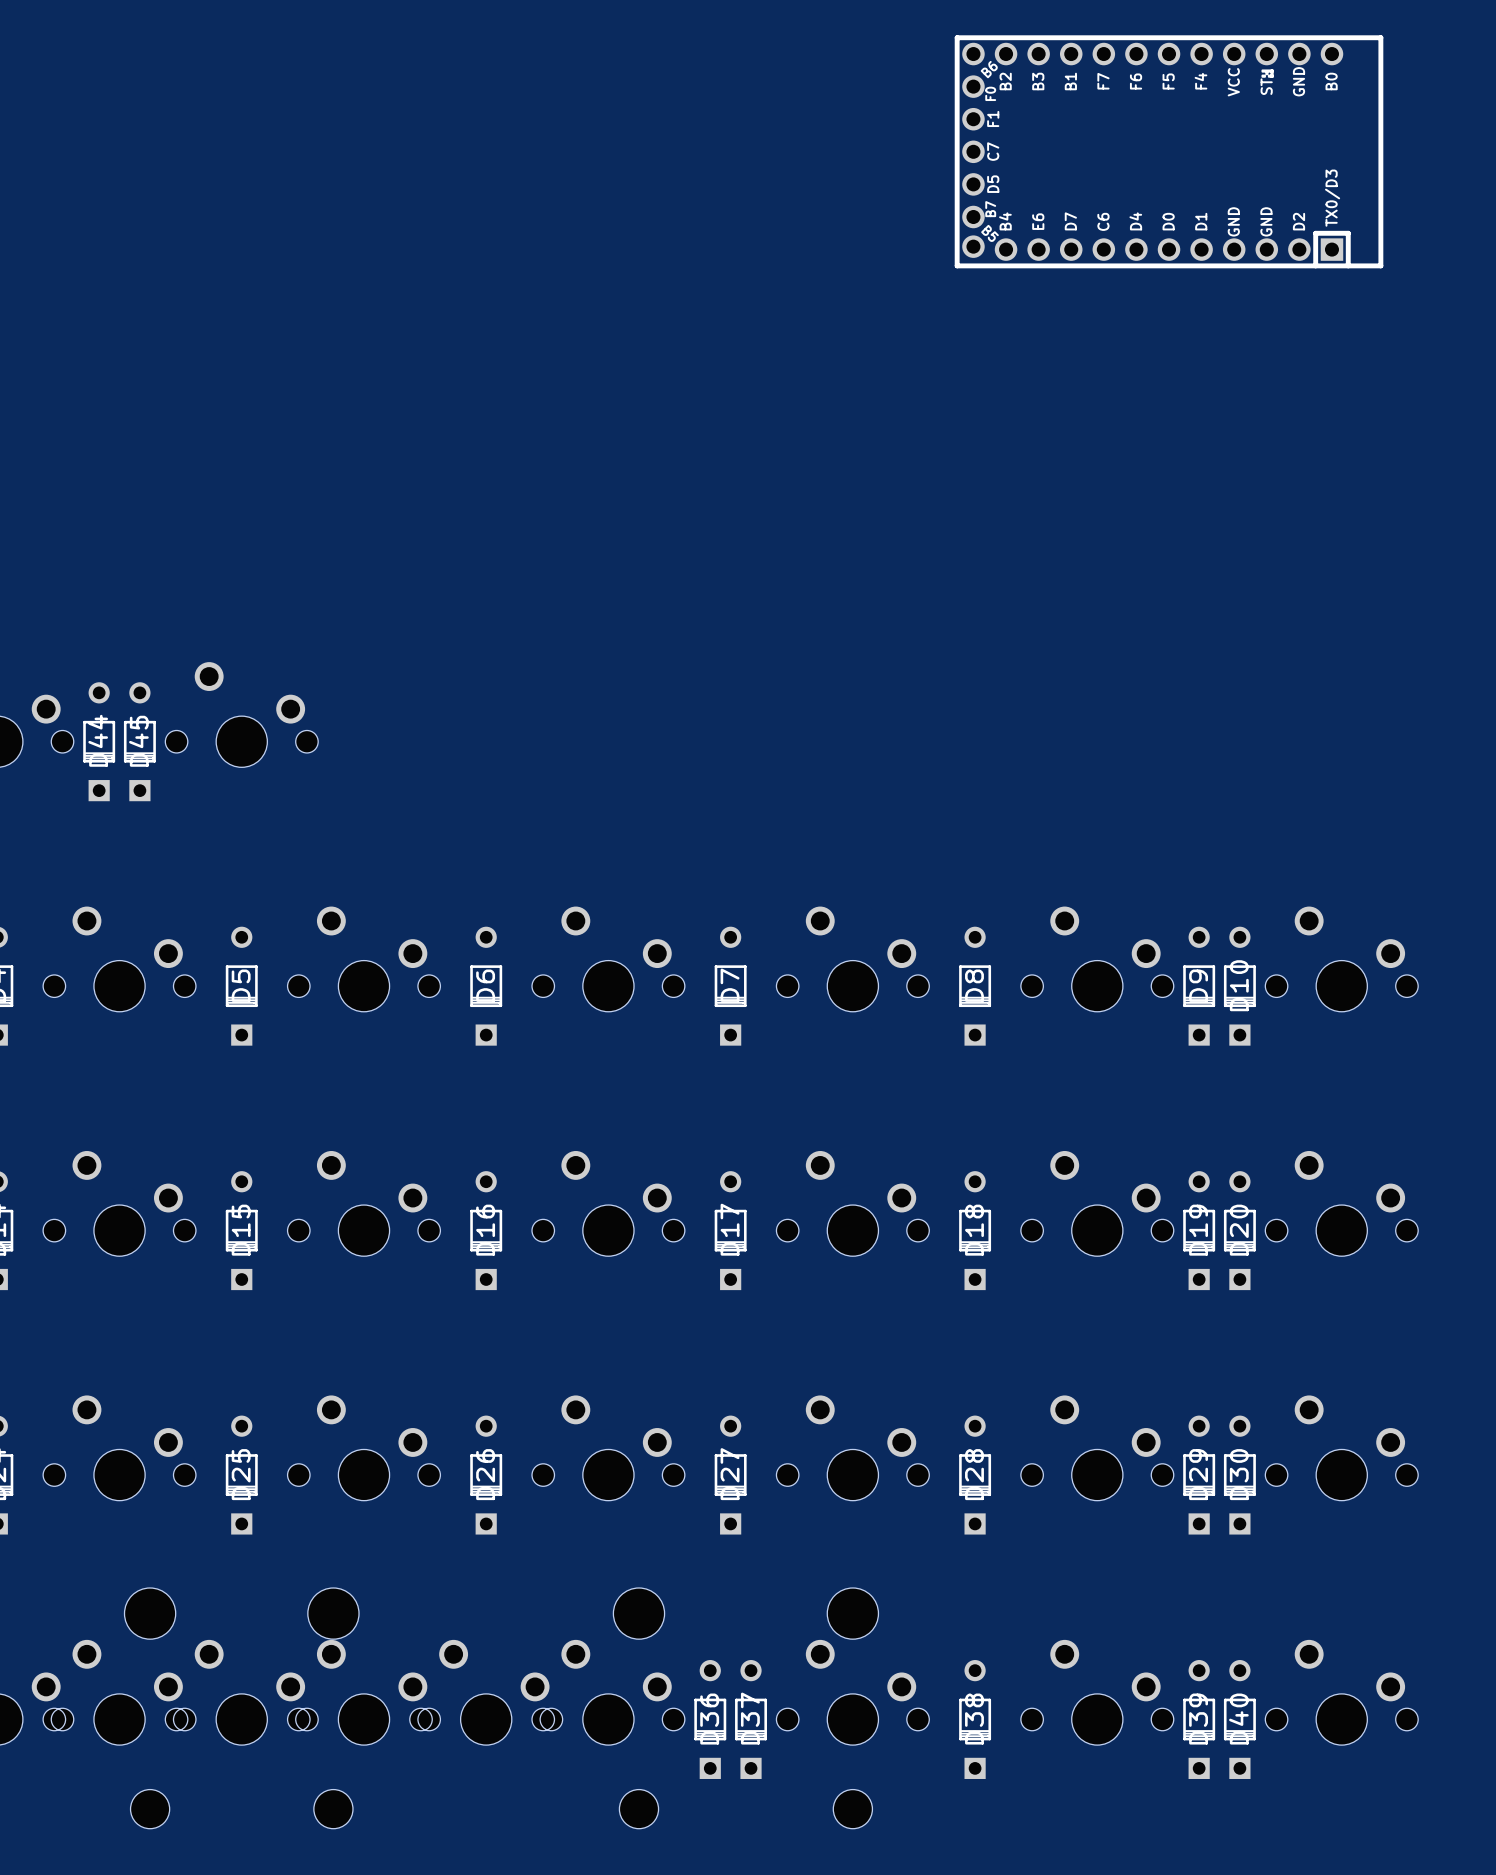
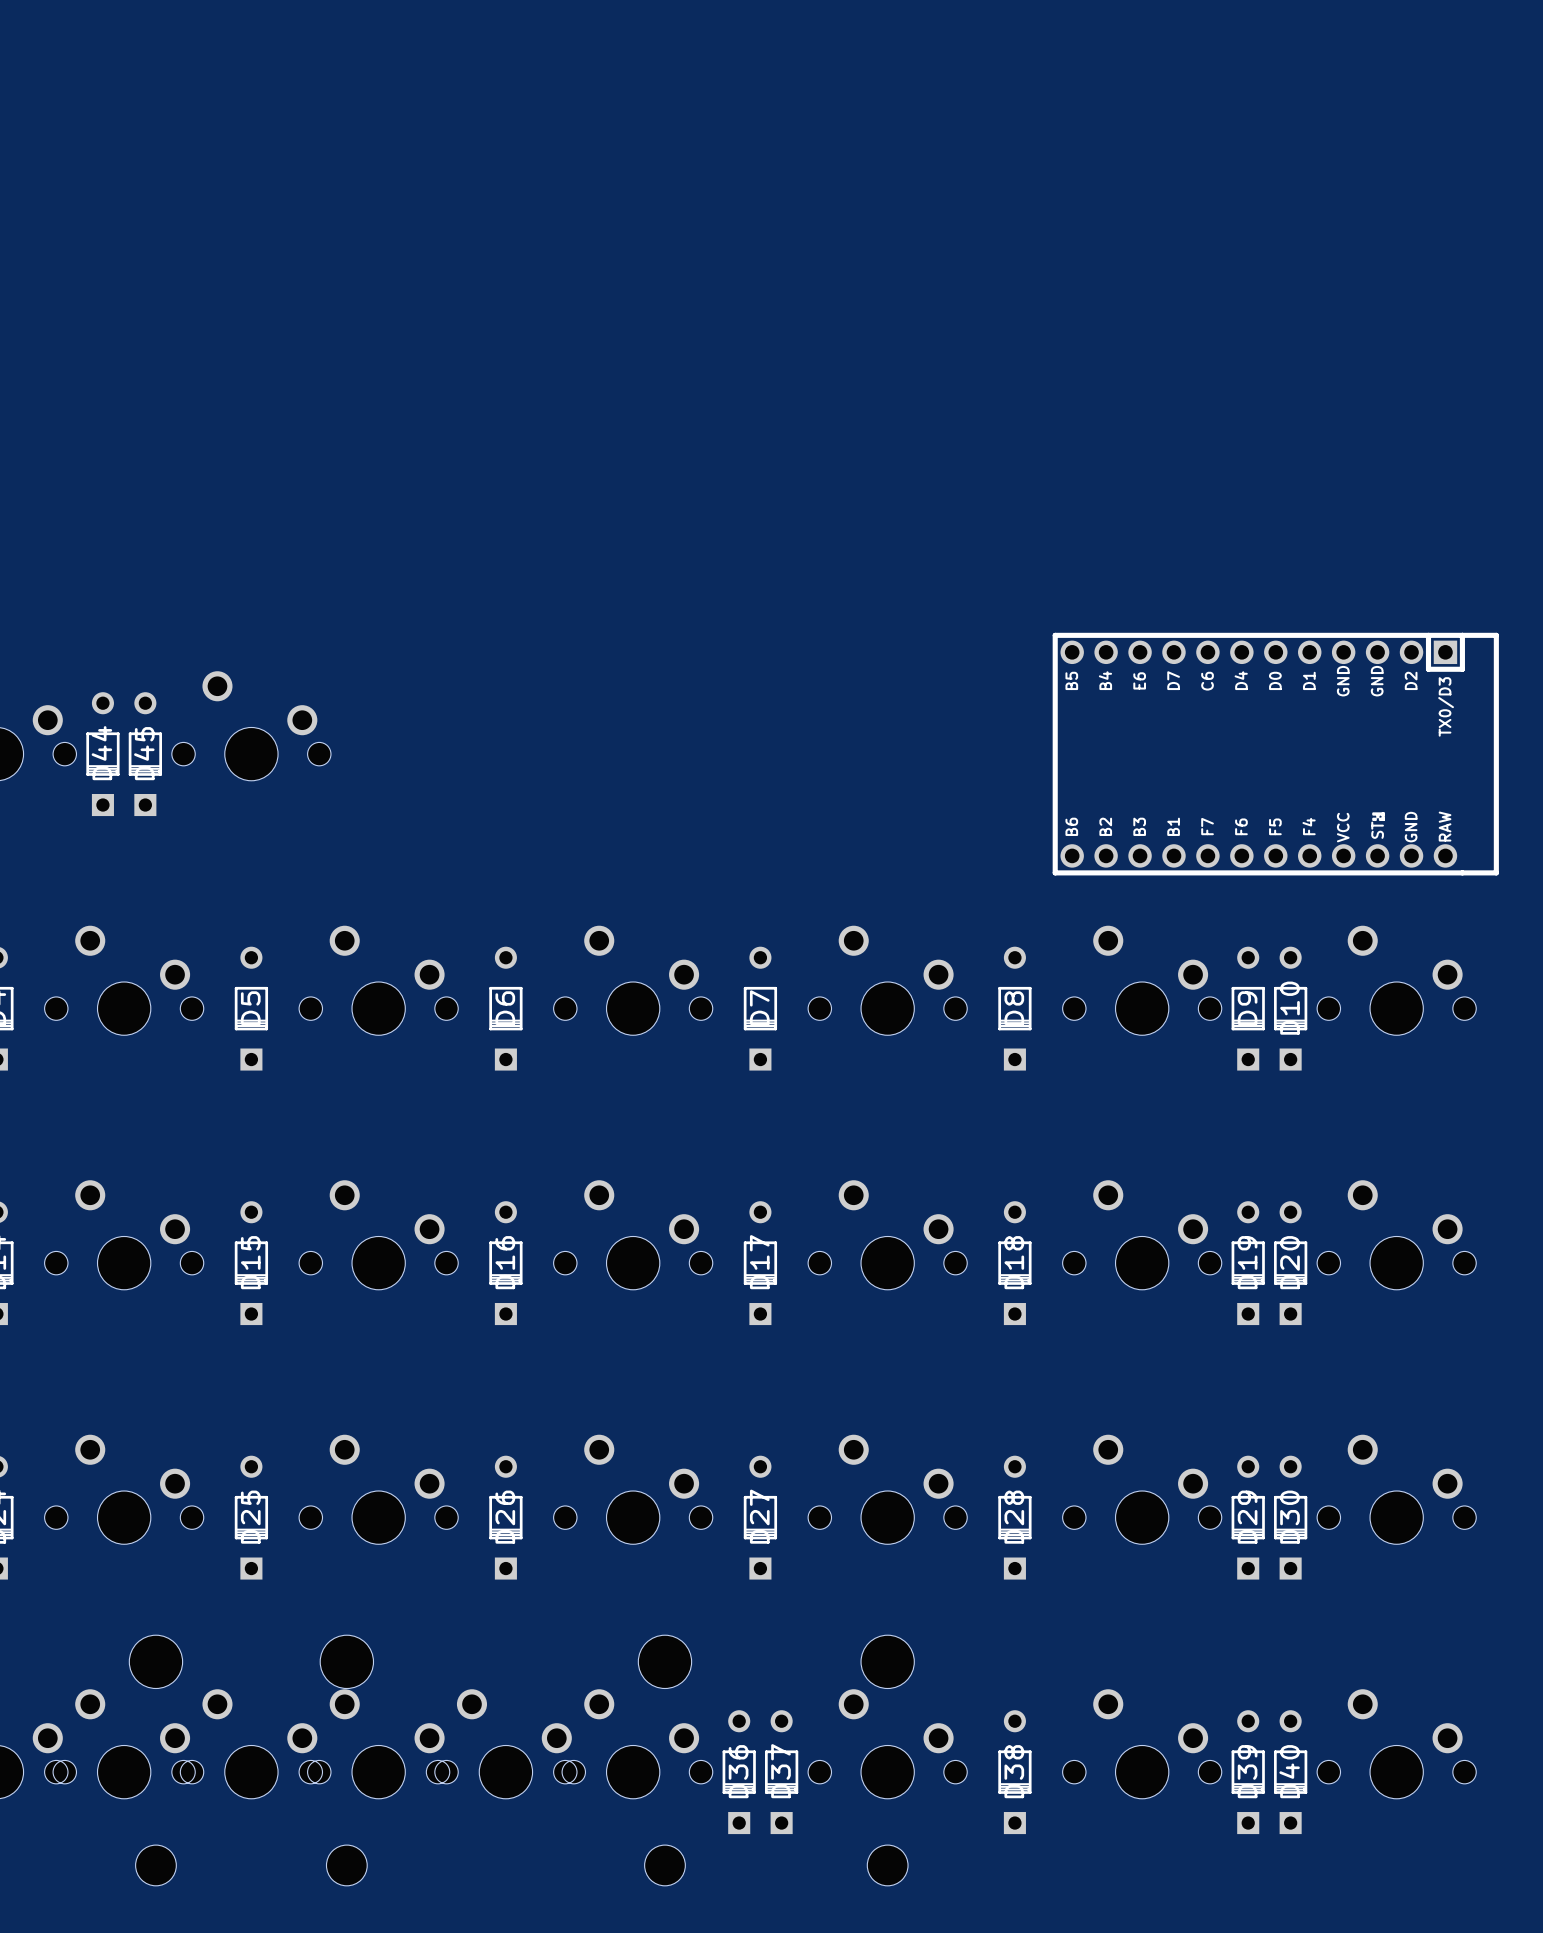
part: (1169, 151) -> none
part: none -> (1275, 754)

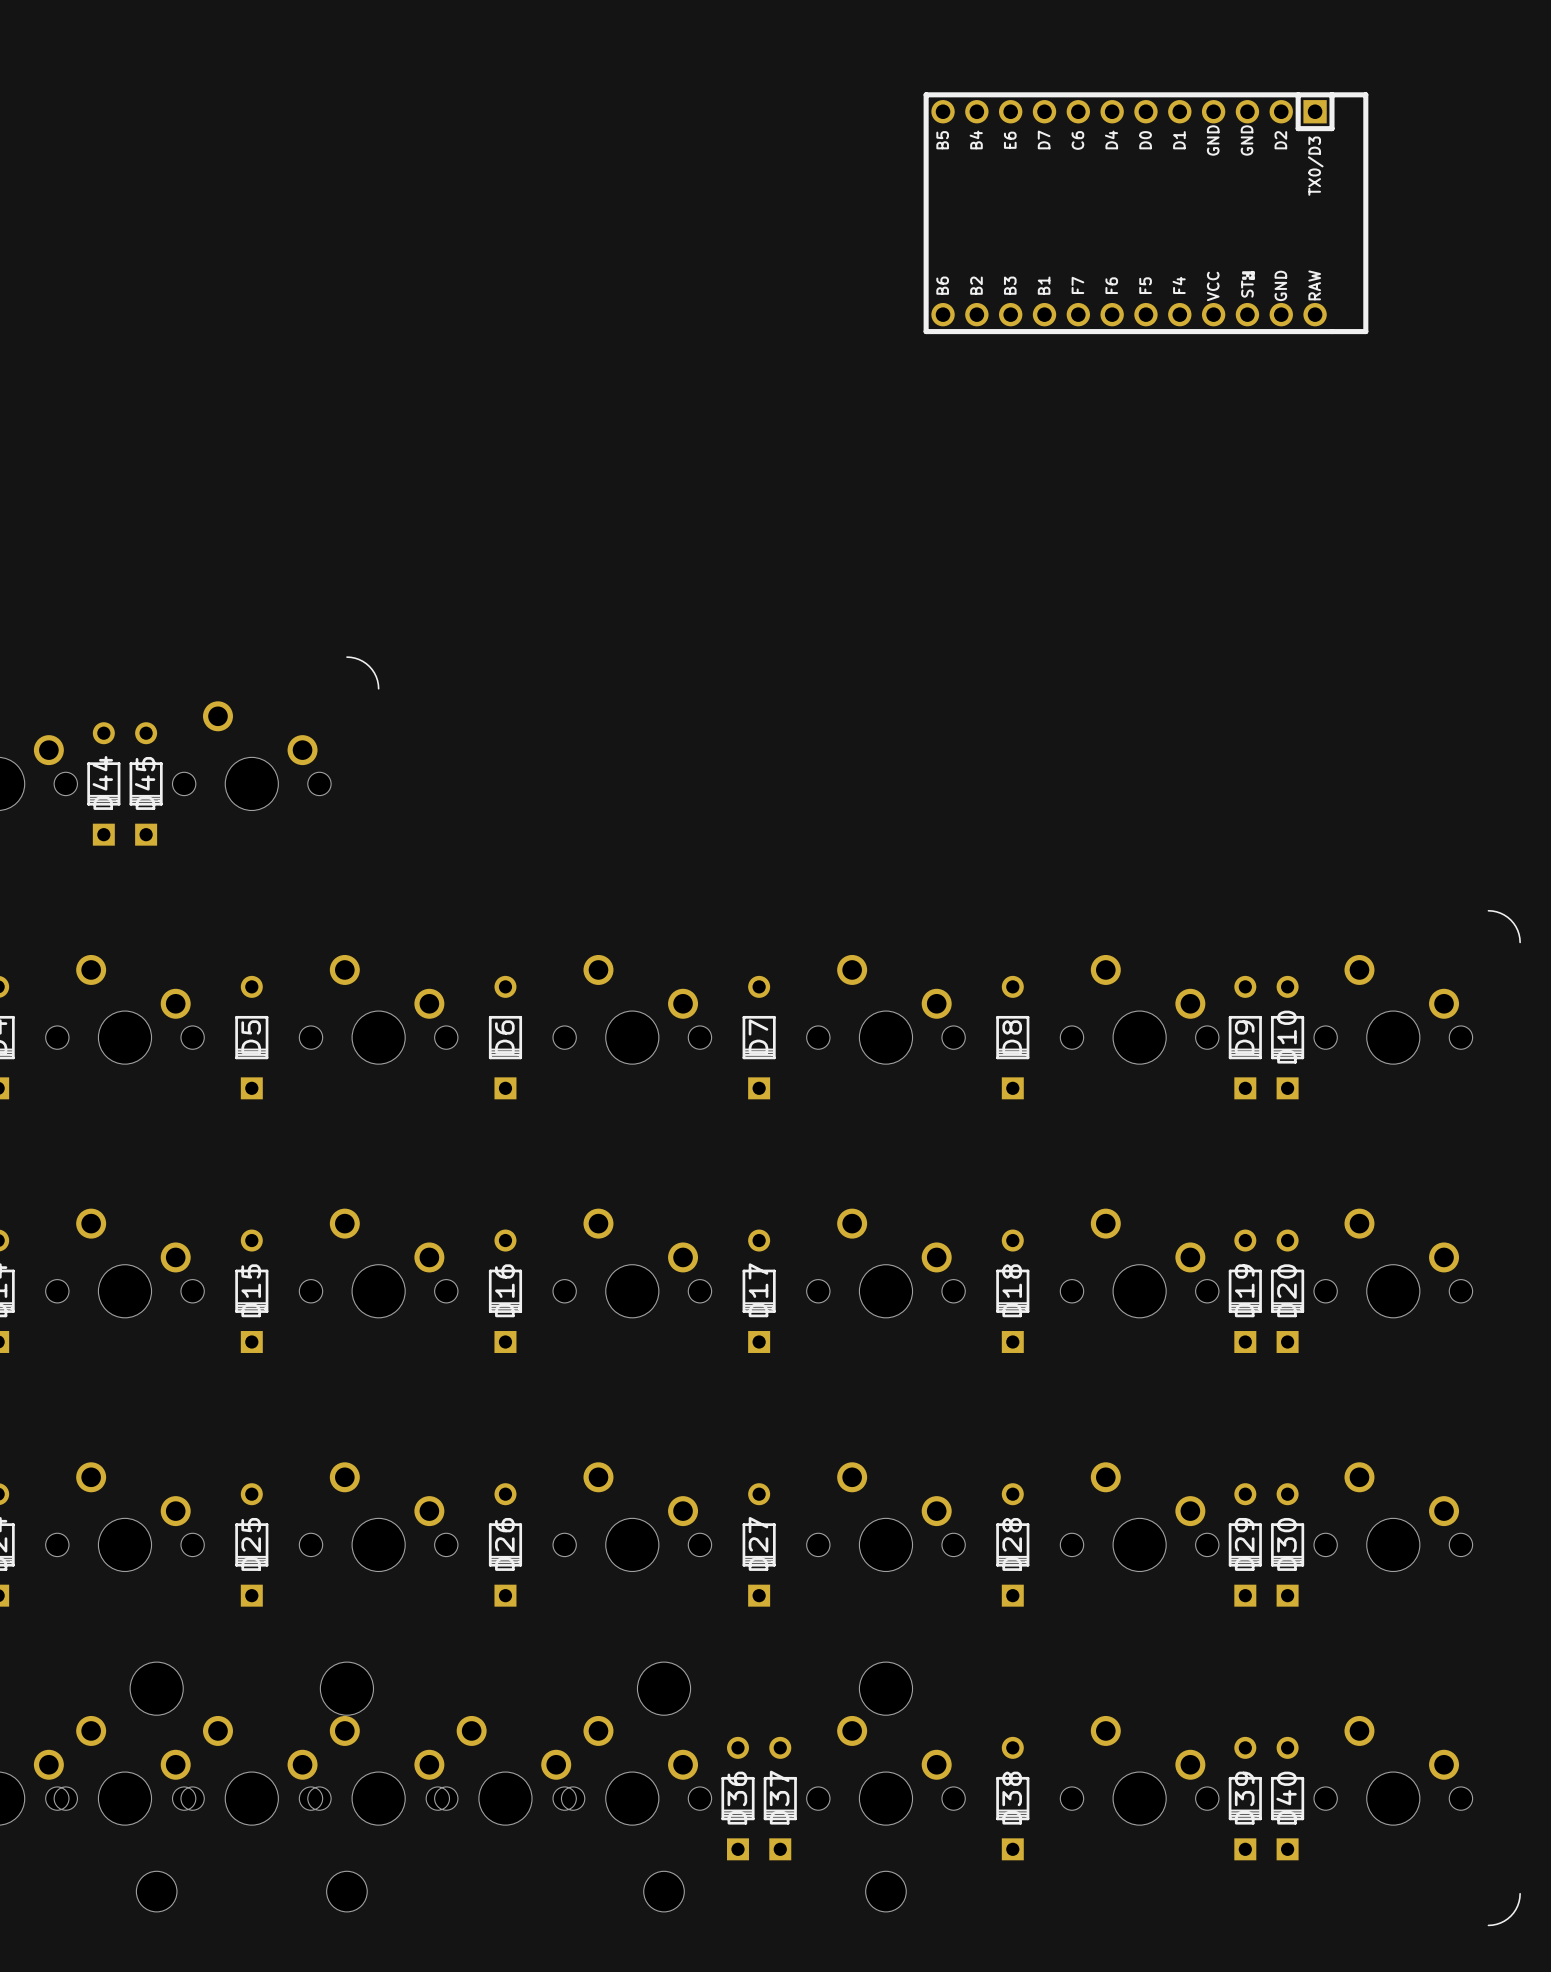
part: none -> (1145, 213)
line: none -> (346, 657) (359, 659) (369, 666) (376, 676) (378, 688)
part: (1275, 754) -> none
line: none -> (1488, 910) (1500, 913) (1510, 920) (1517, 930) (1520, 942)
line: none -> (1520, 1893) (1517, 1905) (1510, 1916) (1500, 1923) (1488, 1925)

